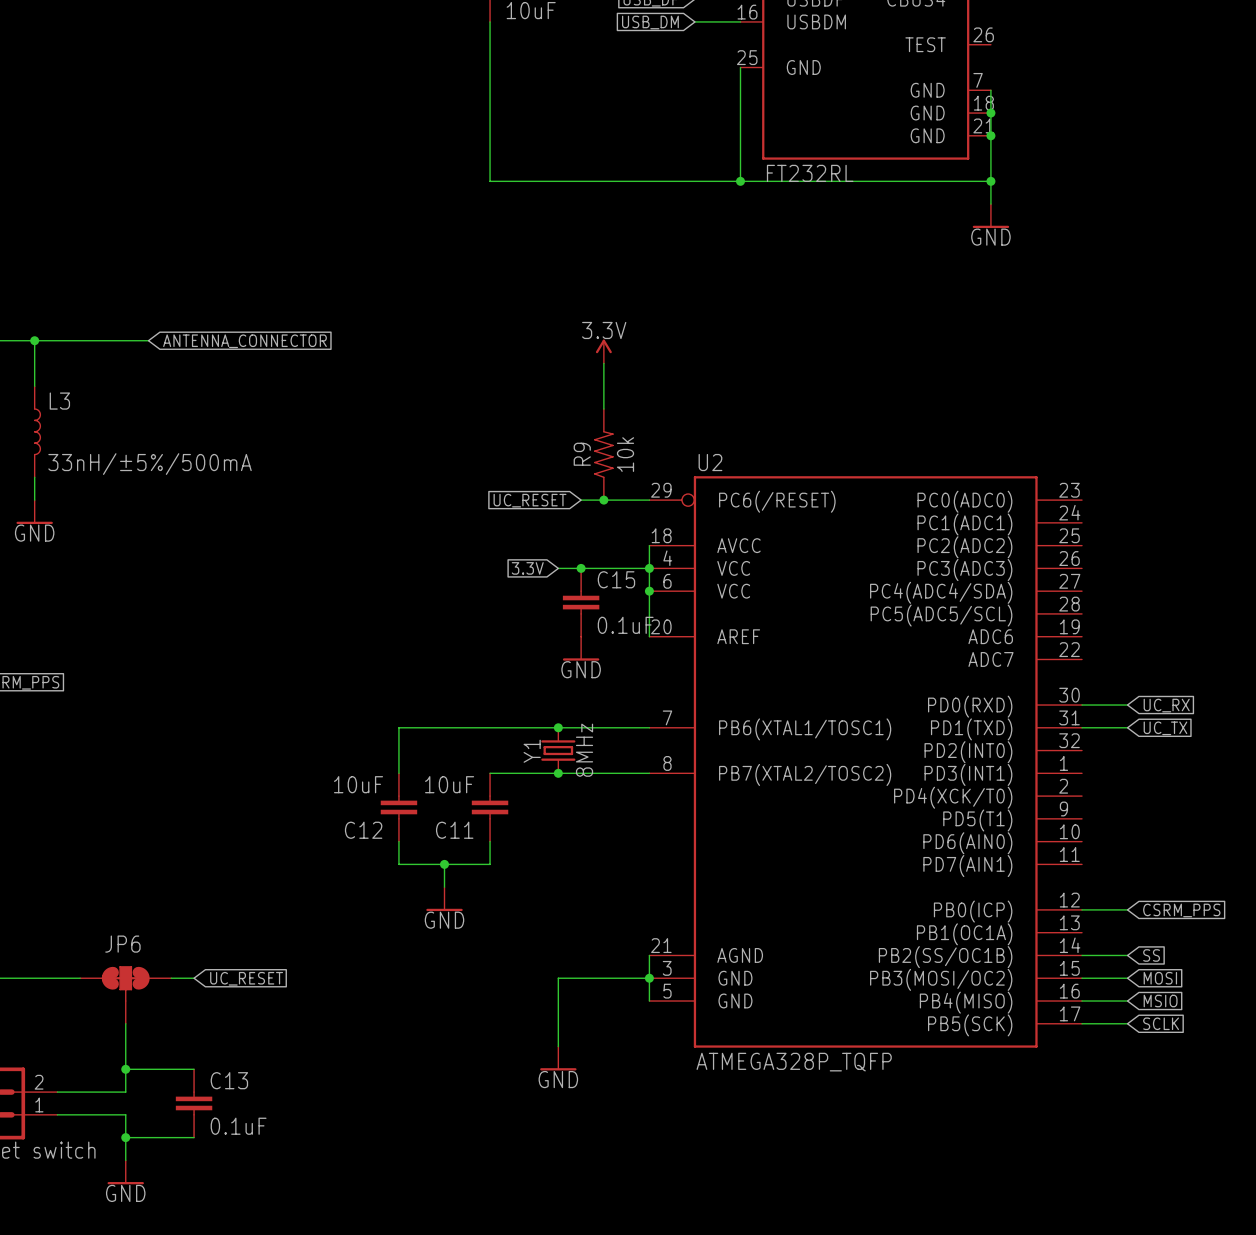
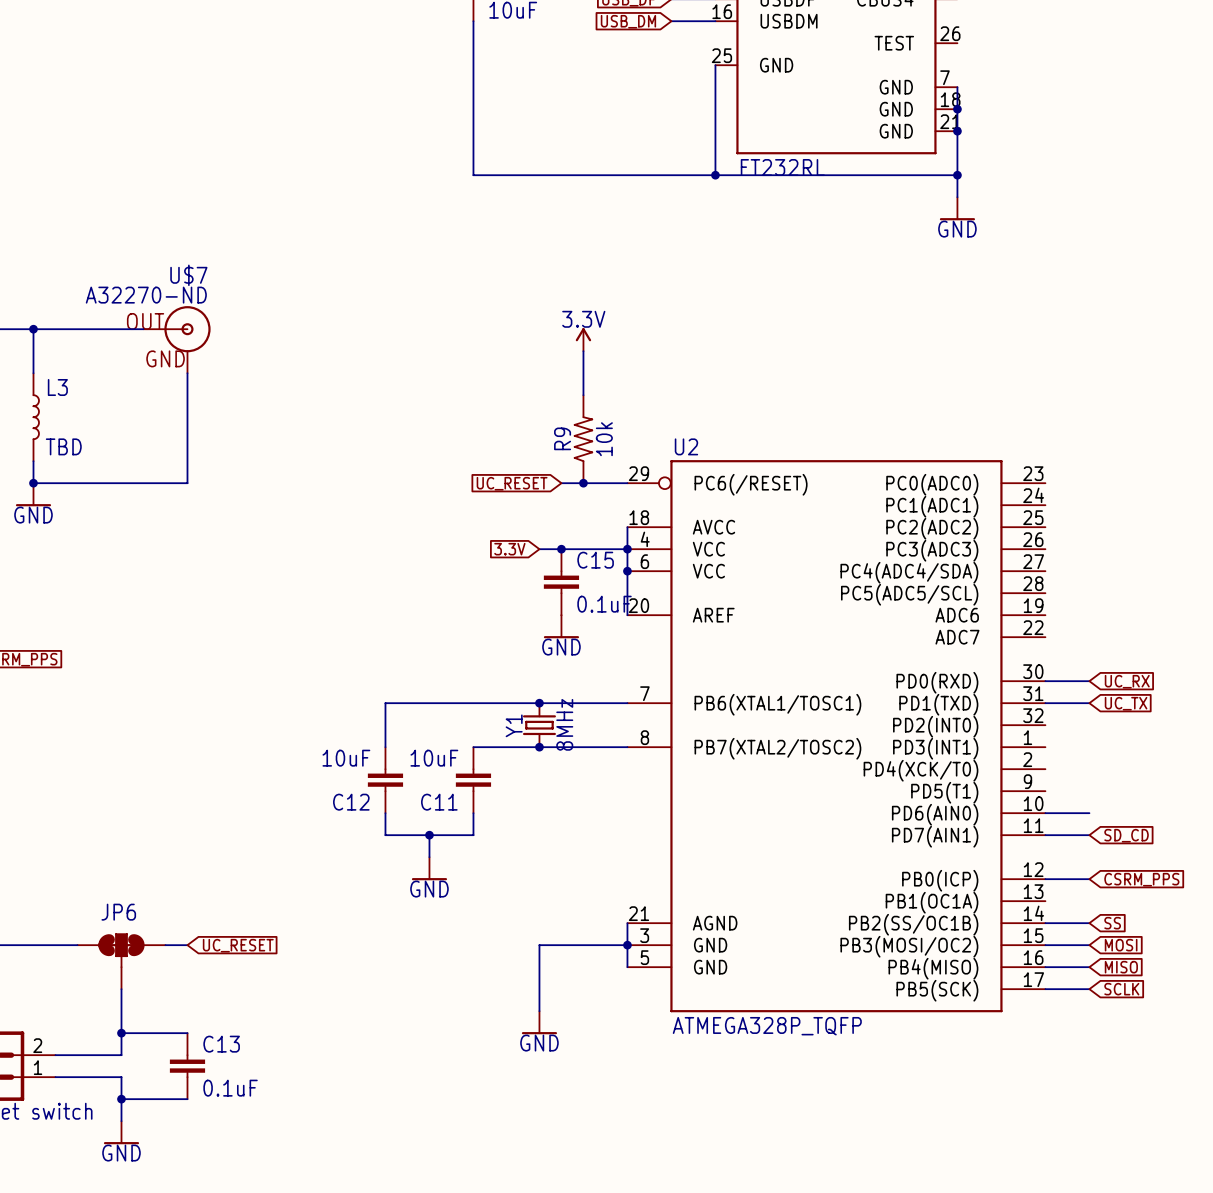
global label: ANTENNA_CONNECTOR (244, 341) -> none
U$7: none -> A32270-ND (177, 339)
wire: none -> (187, 373) (187, 483) (33, 483)
L3 value: 33nH/±5%/500mA (150, 464) -> TBD (63, 446)
junction: none -> (33, 483)
wire: none -> (1045, 813) (1089, 813)
wire: none -> (1045, 835) (1089, 835)
global label: none -> SD_CD (1126, 835)
global label: MSIO (1160, 1001) -> MISO (1121, 967)

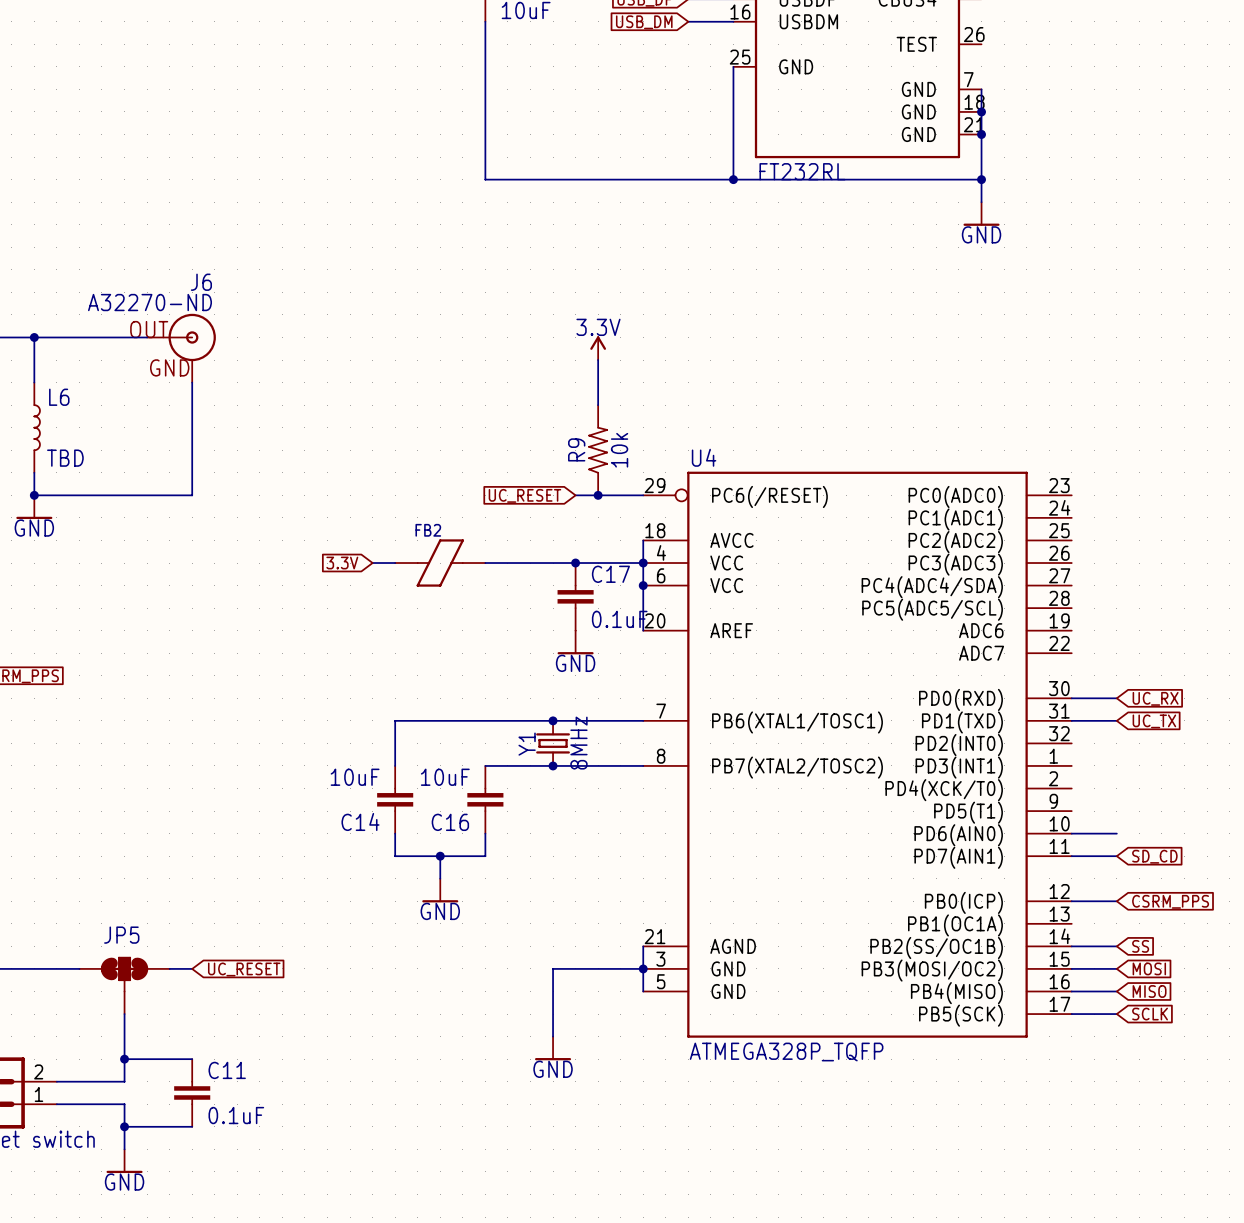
U$7 name: U$7 (188, 275) -> J6 (201, 282)
L3 name: L3 (57, 387) -> L6 (59, 397)
U2 name: U2 (686, 446) -> U4 (704, 457)
wire: none -> (372, 563) (395, 563)
FB2: none -> (440, 563)
wire: none -> (485, 563) (553, 563)
global label position: 3.3V (509, 549) -> 3.3V (342, 563)
C15 name: C15 (595, 560) -> C17 (610, 574)
C12 name: C12 (351, 802) -> C14 (360, 821)
C11 name: C11 (439, 802) -> C16 (450, 822)
JP6 name: JP6 (118, 912) -> JP5 (121, 935)
C13 name: C13 (221, 1044) -> C11 (227, 1070)

